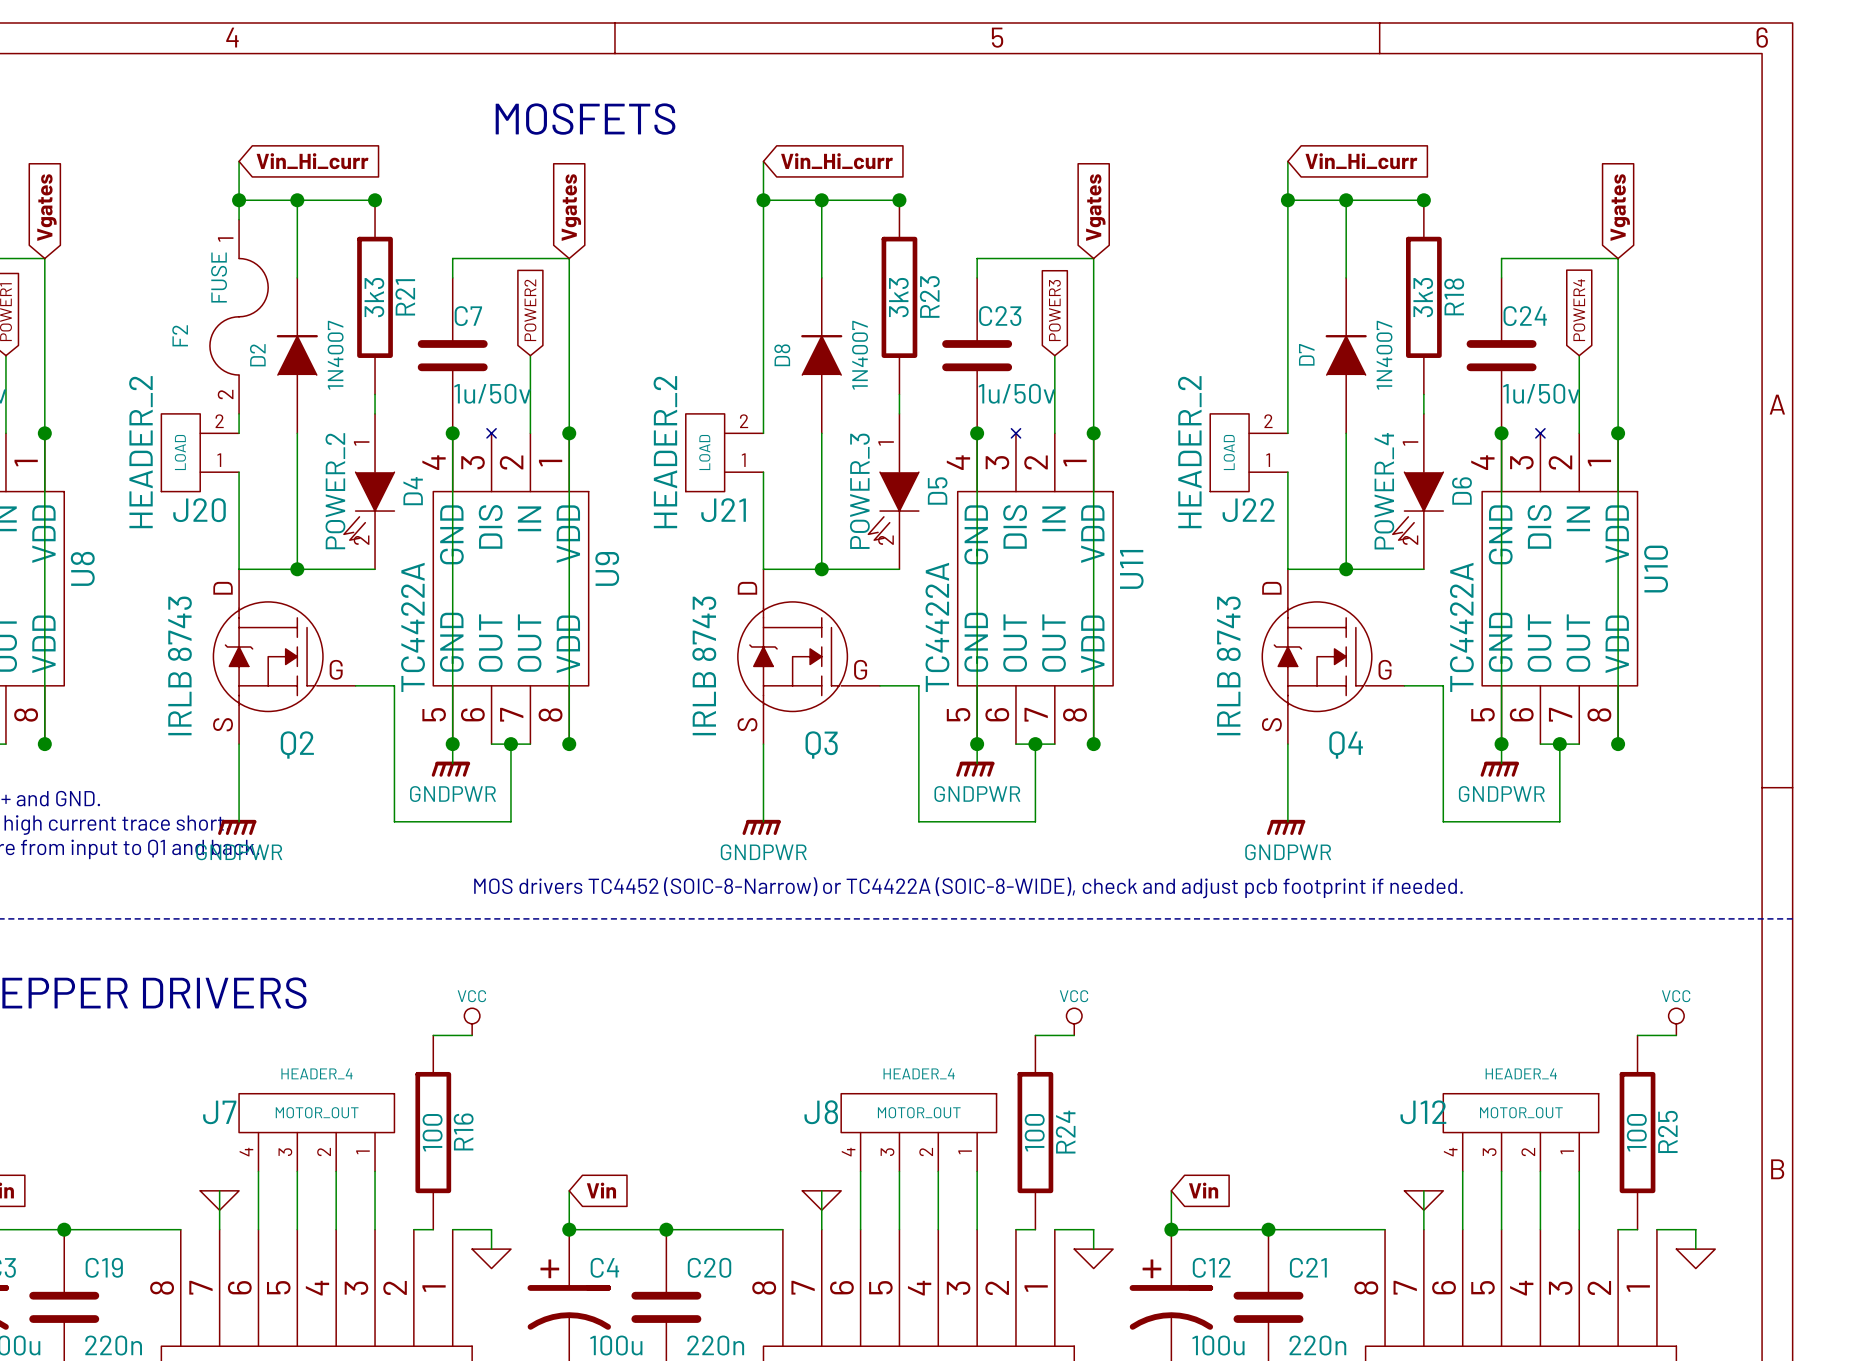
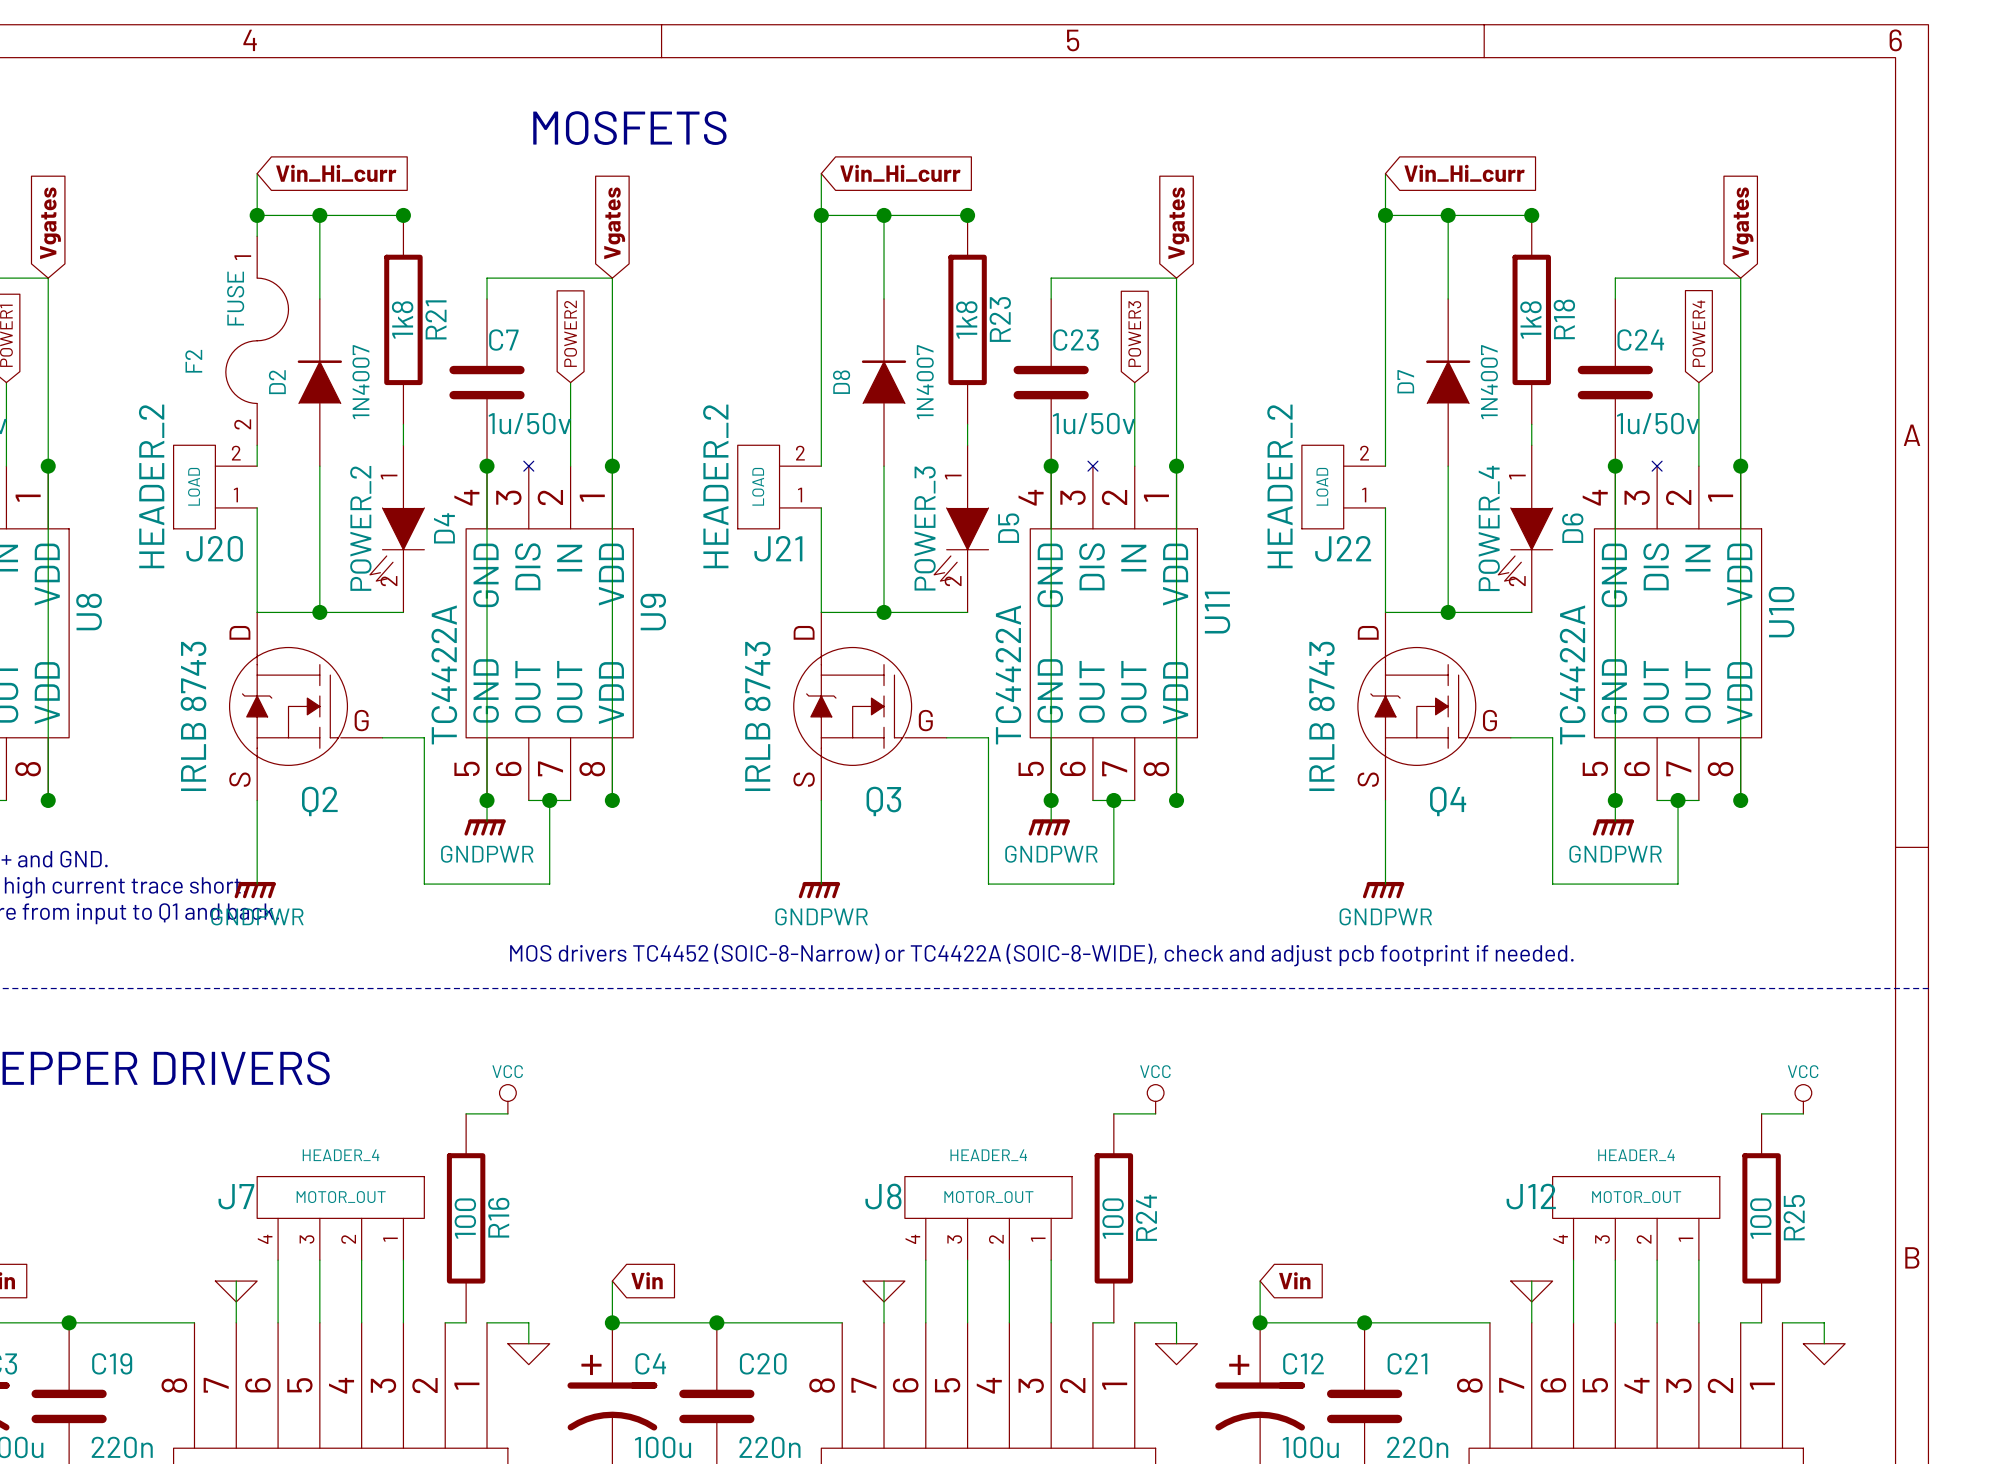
R21 value: 3k3 (374, 297) -> 1k8 (402, 319)
R23 value: 3k3 (898, 297) -> 1k8 (966, 319)
R18 value: 3k3 (1423, 297) -> 1k8 (1530, 319)

